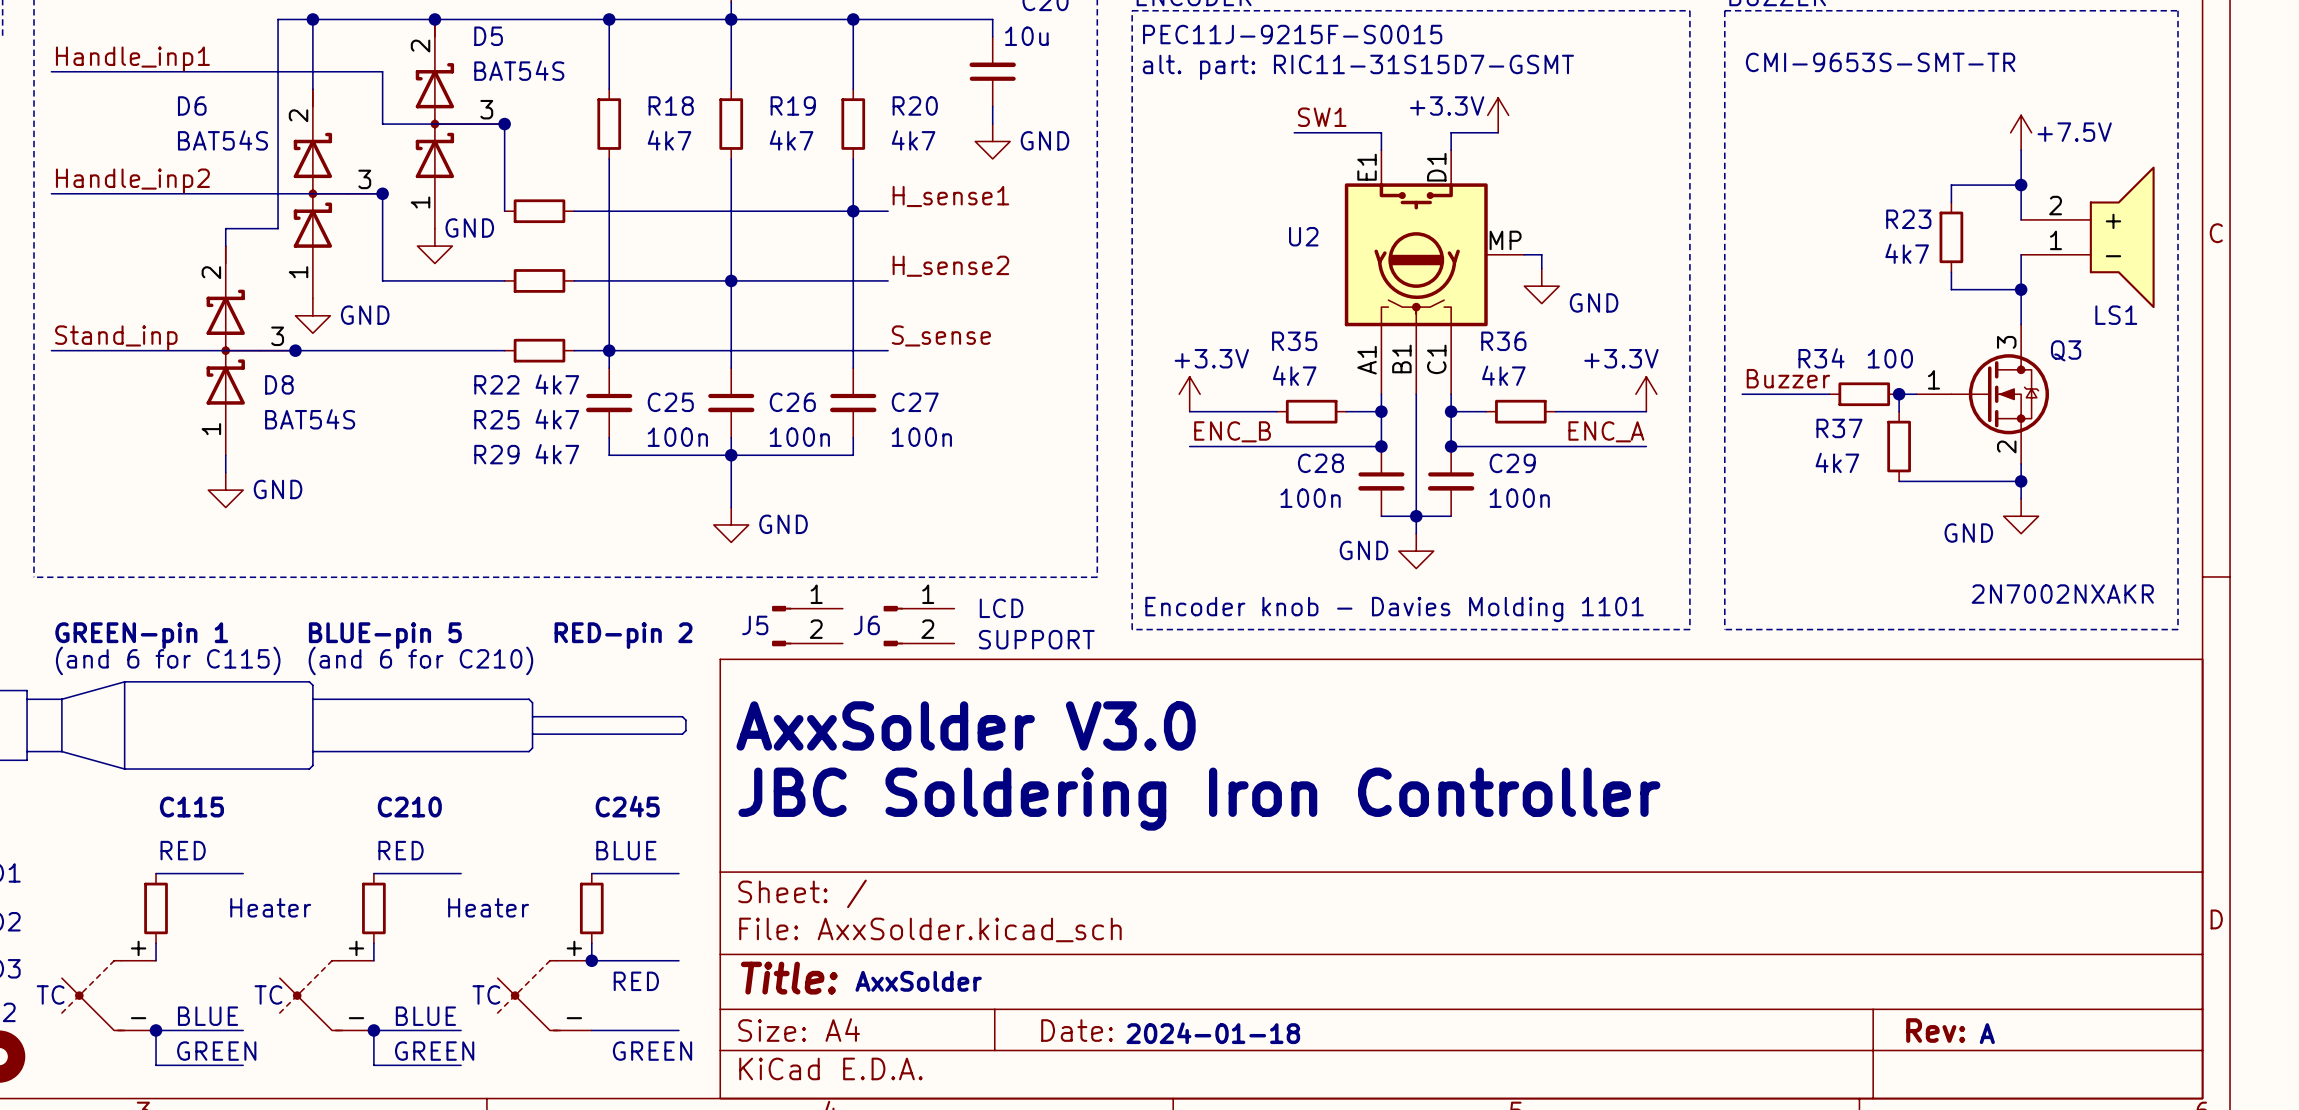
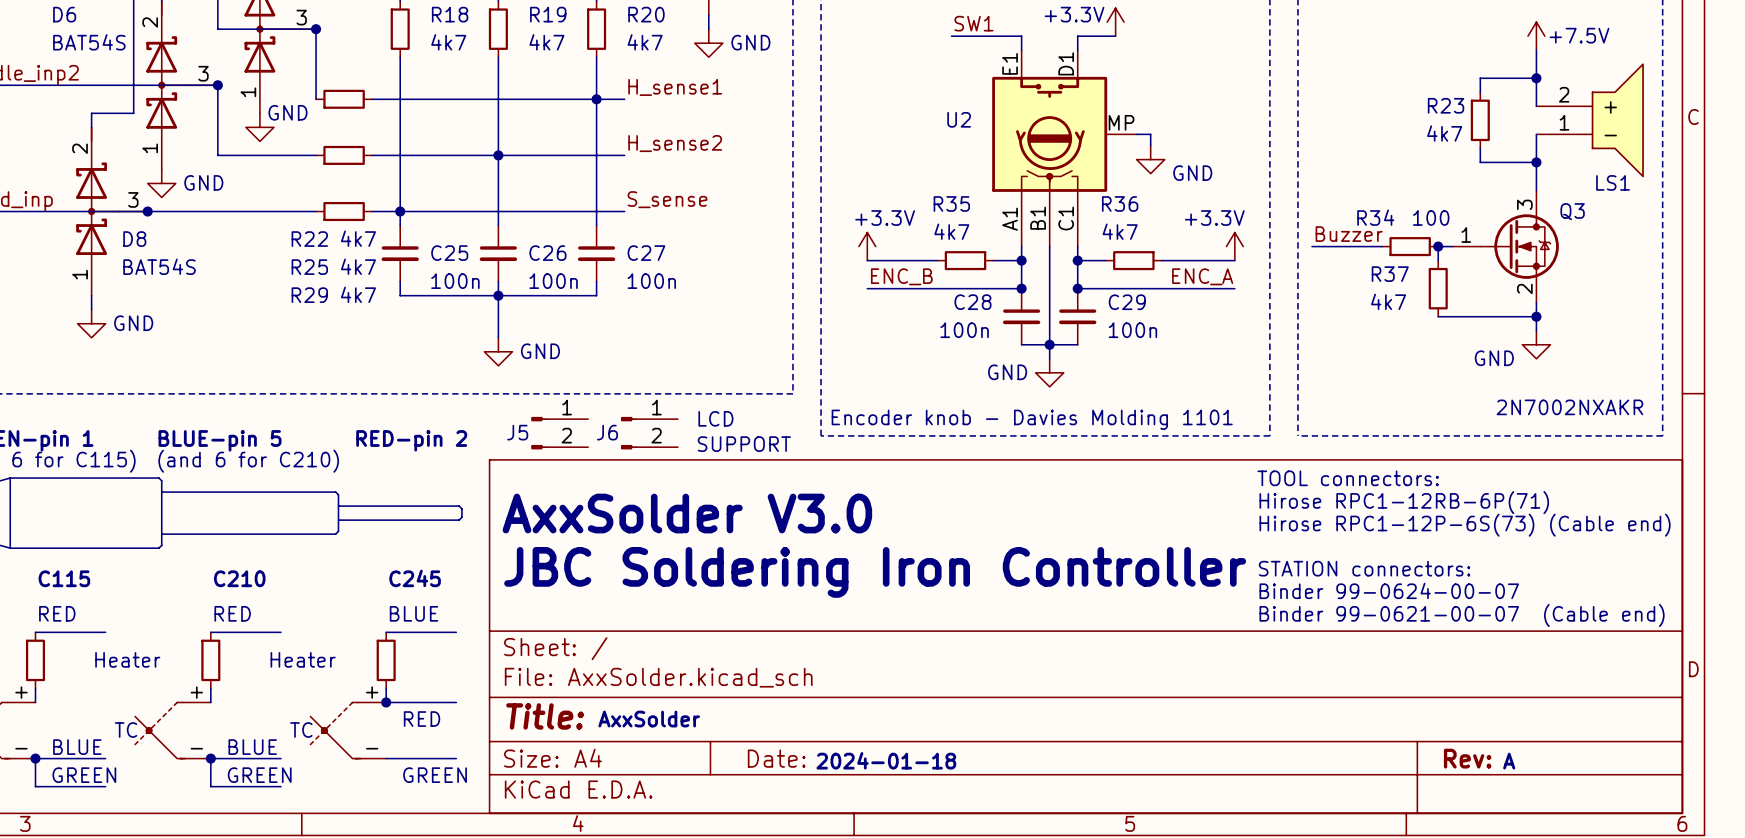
text: none -> TOOL connectors: (1348, 478)
text: none -> Hirose RPC1-12RB-6P(71) (1404, 502)
text: none -> Hirose RPC1-12P-6S(73) (Cable end) (1465, 525)
text: none -> STATION connectors: (1364, 568)
text: none -> Binder 99-0624-00-07 (1389, 590)
text: none -> Binder 99-0621-00-07 (Cable end) (1462, 615)

